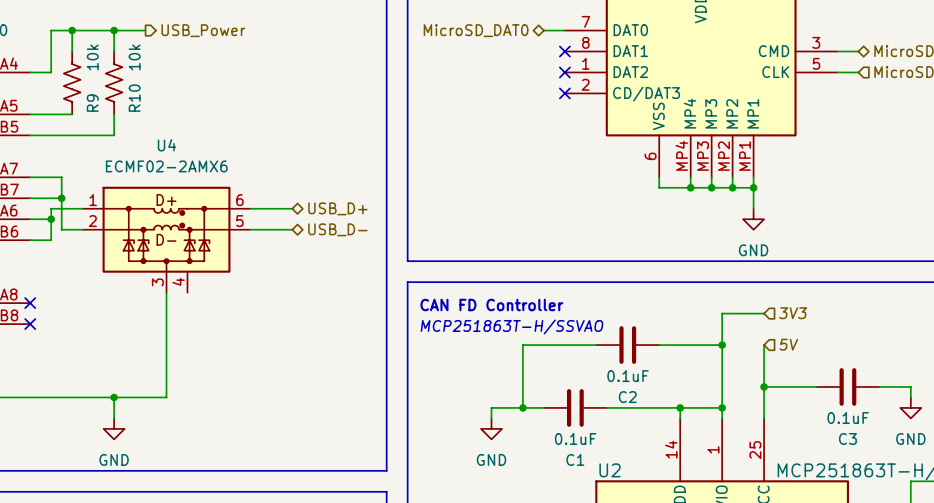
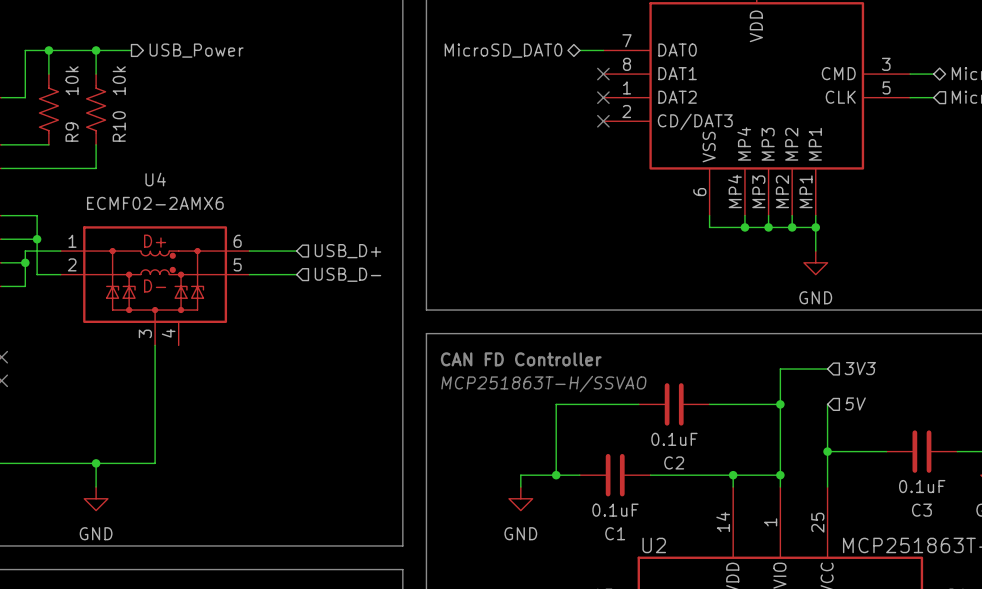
hierarchical label shape: bidirectional (337, 208) -> input (347, 251)
hierarchical label shape: bidirectional (337, 229) -> input (347, 274)

